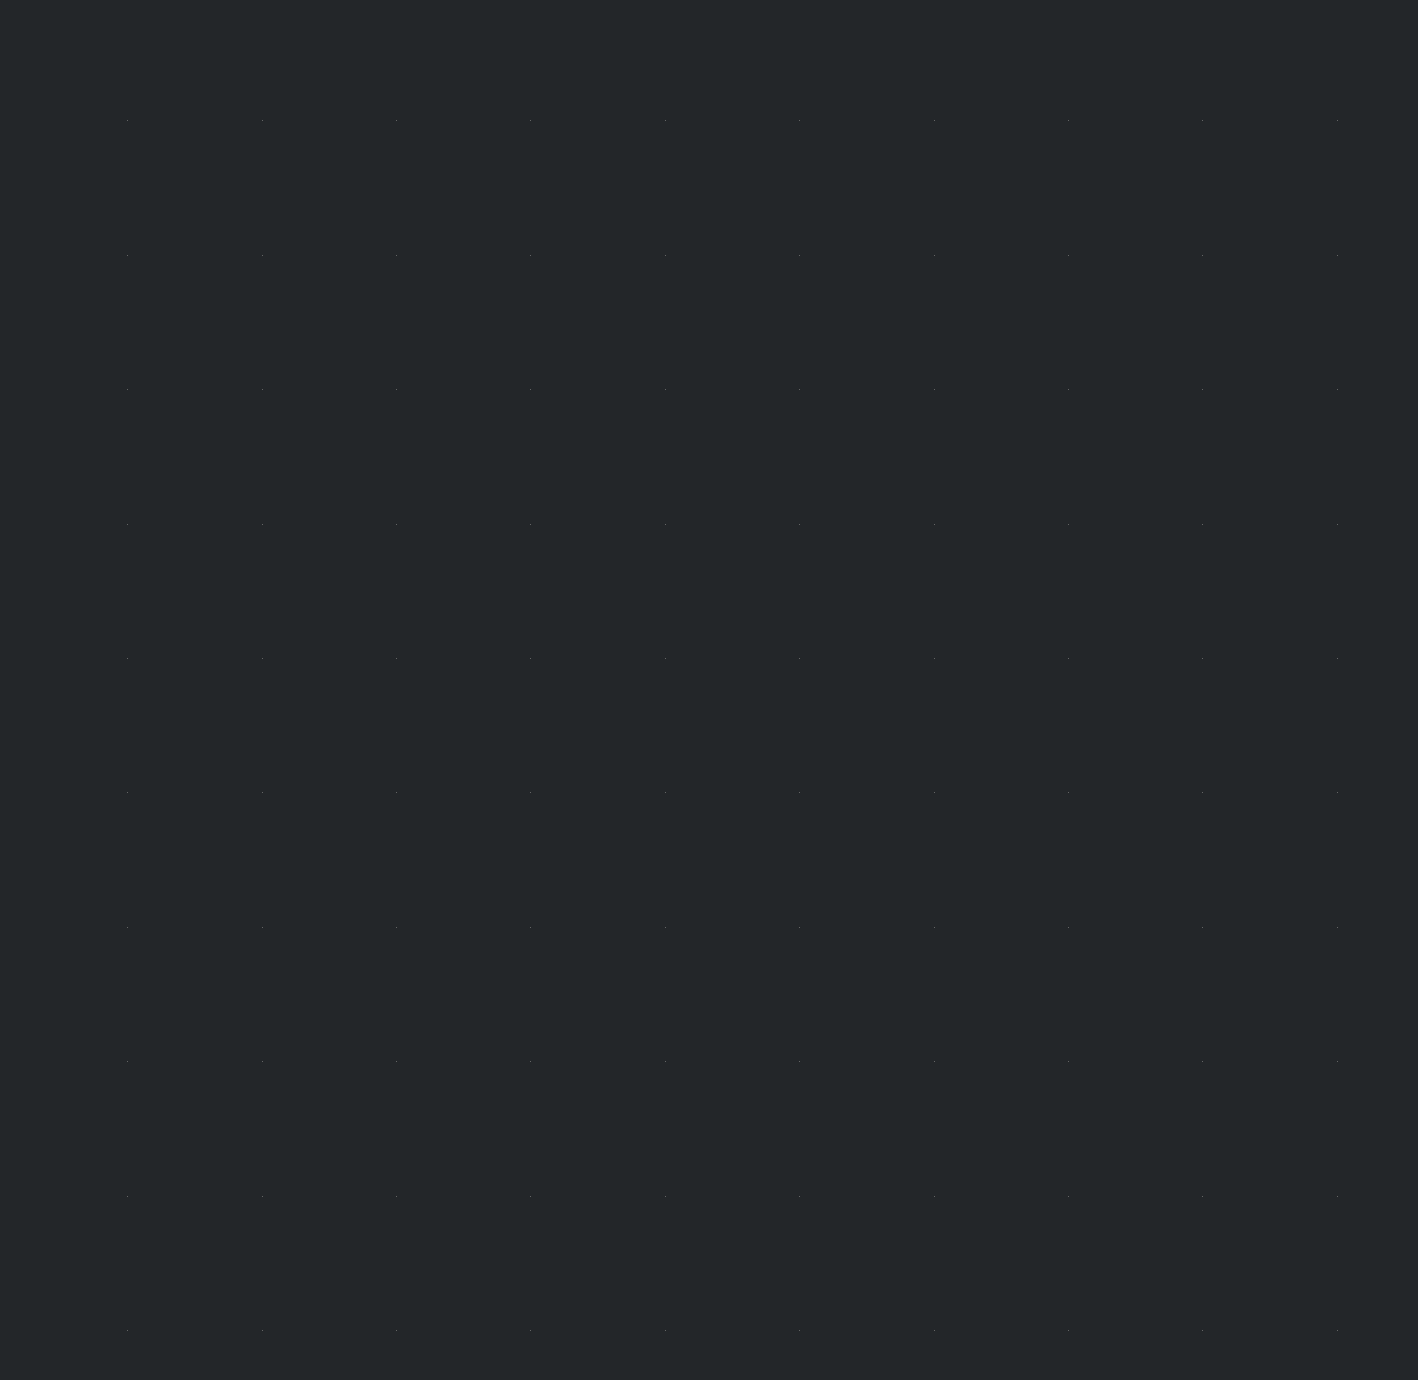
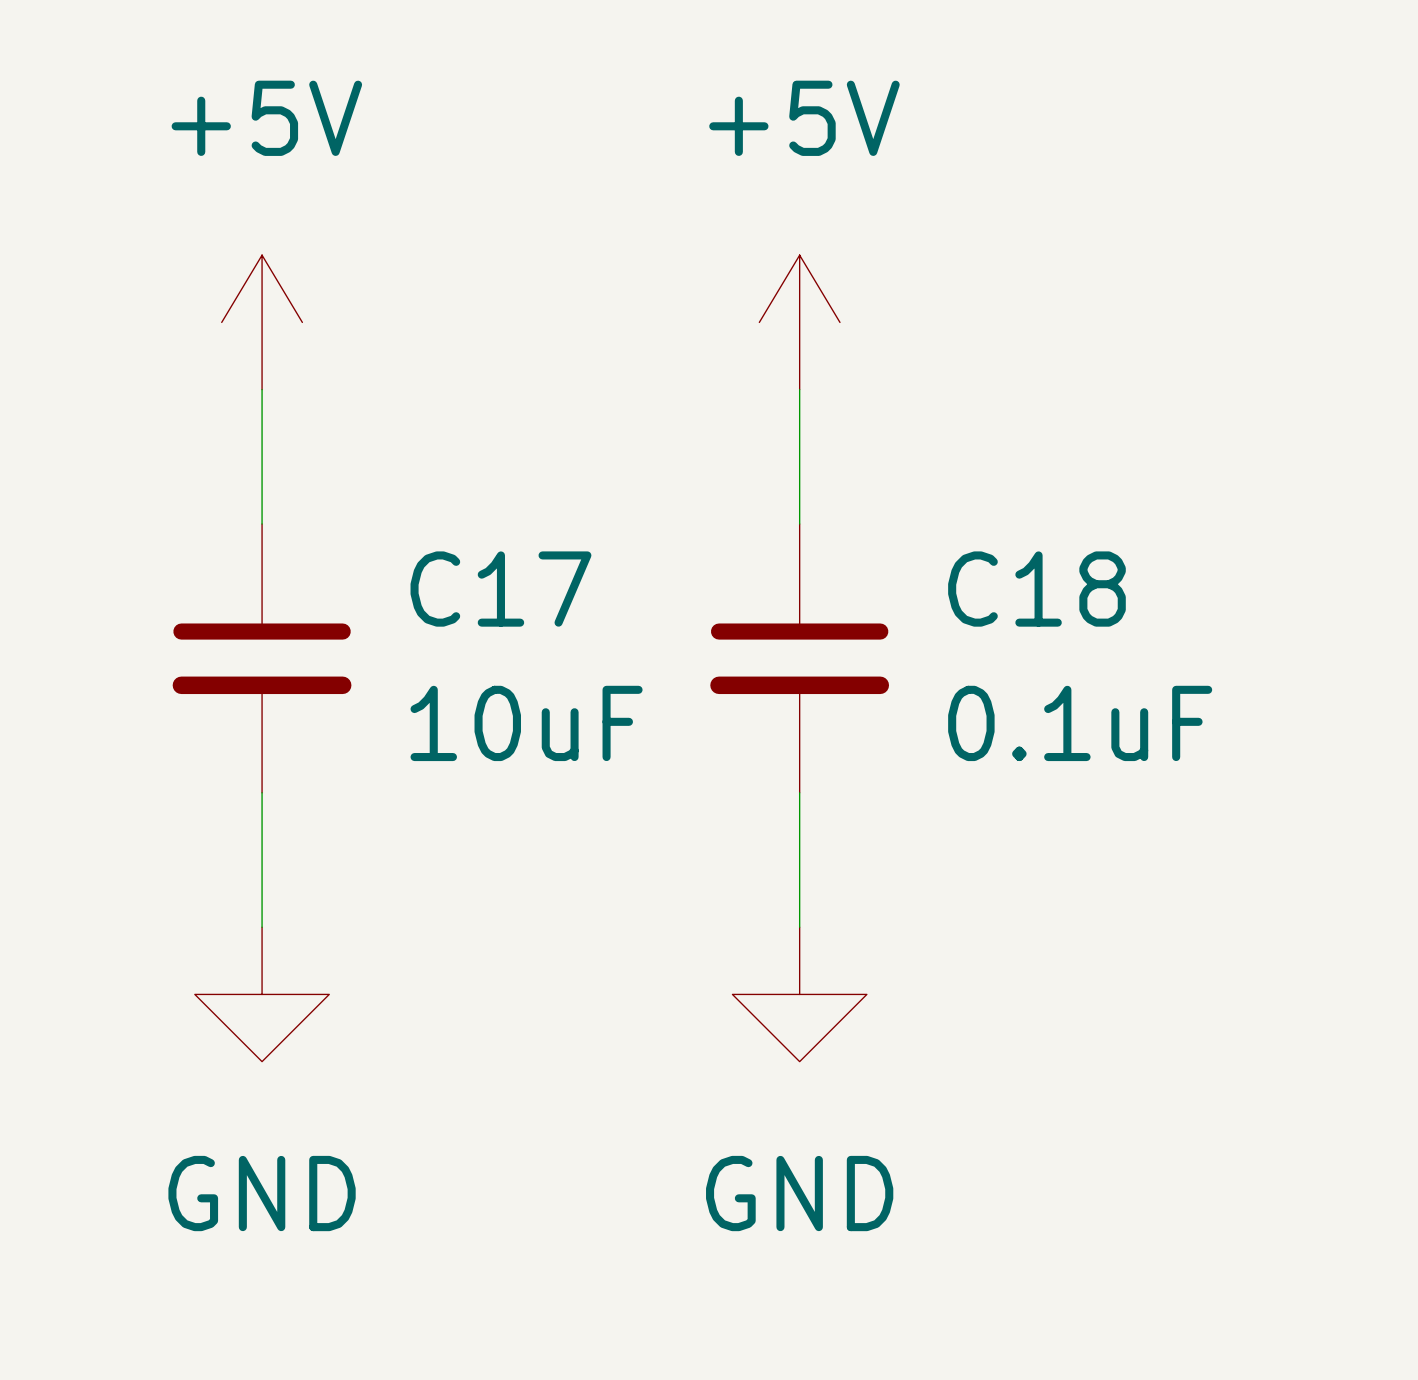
power symbol: none -> +5V (262, 322)
power symbol: none -> +5V (799, 322)
wire: none -> (262, 389) (262, 524)
wire: none -> (799, 389) (799, 524)
C17: none -> 10uF (262, 658)
C18: none -> 0.1uF (799, 658)
wire: none -> (262, 792) (262, 927)
wire: none -> (799, 792) (799, 927)
power symbol: none -> GND (262, 994)
power symbol: none -> GND (799, 994)

